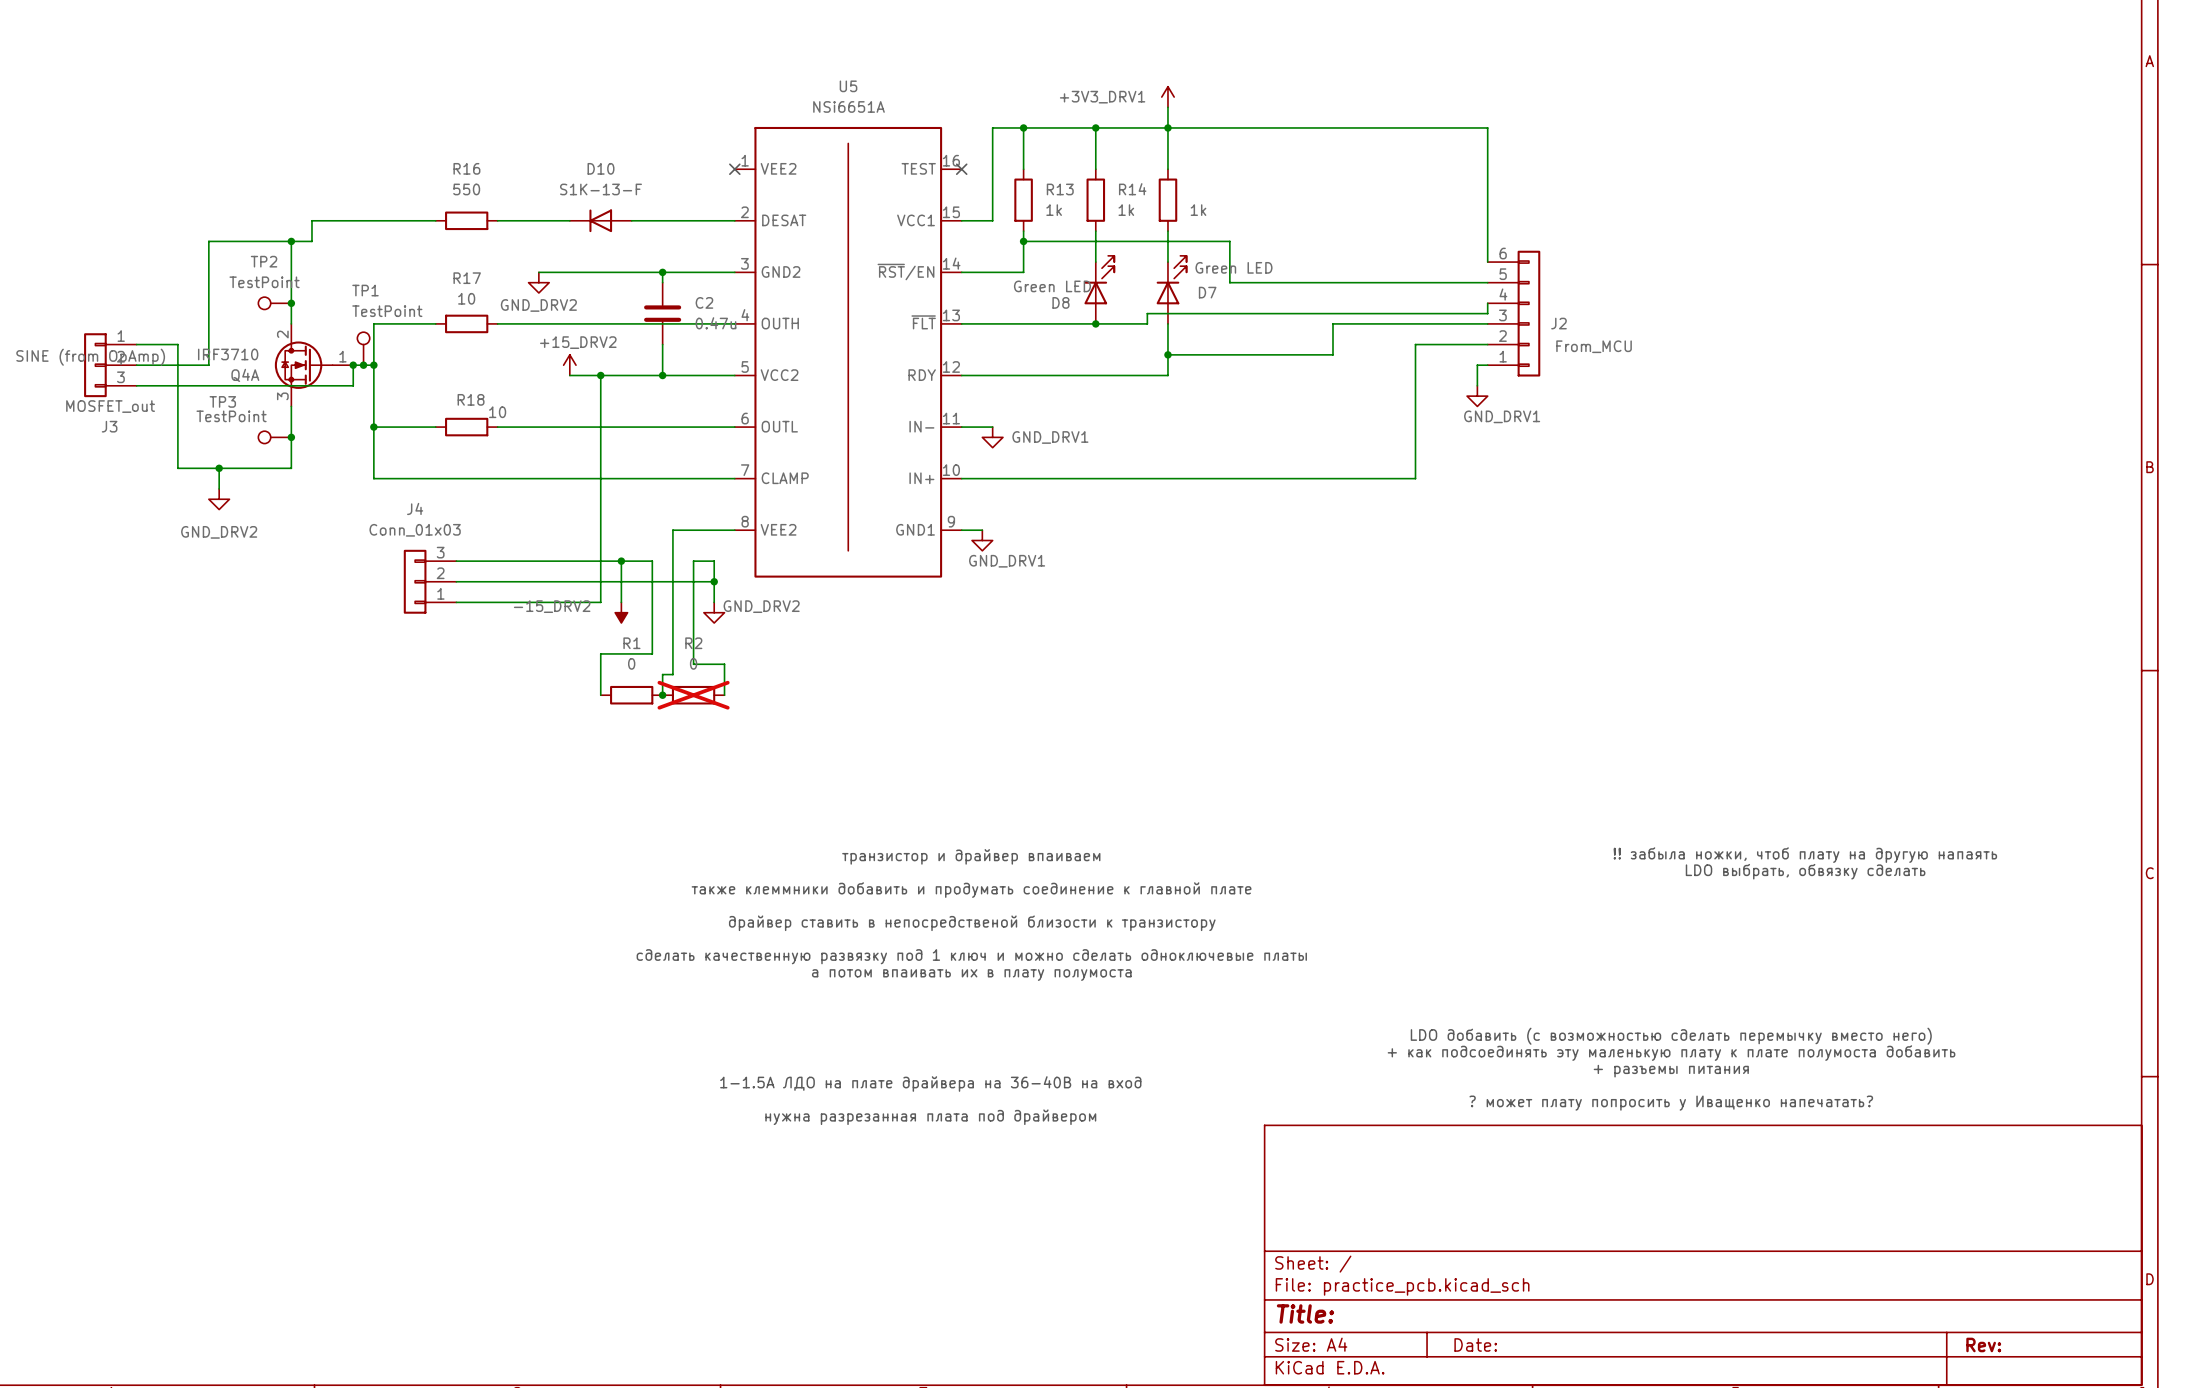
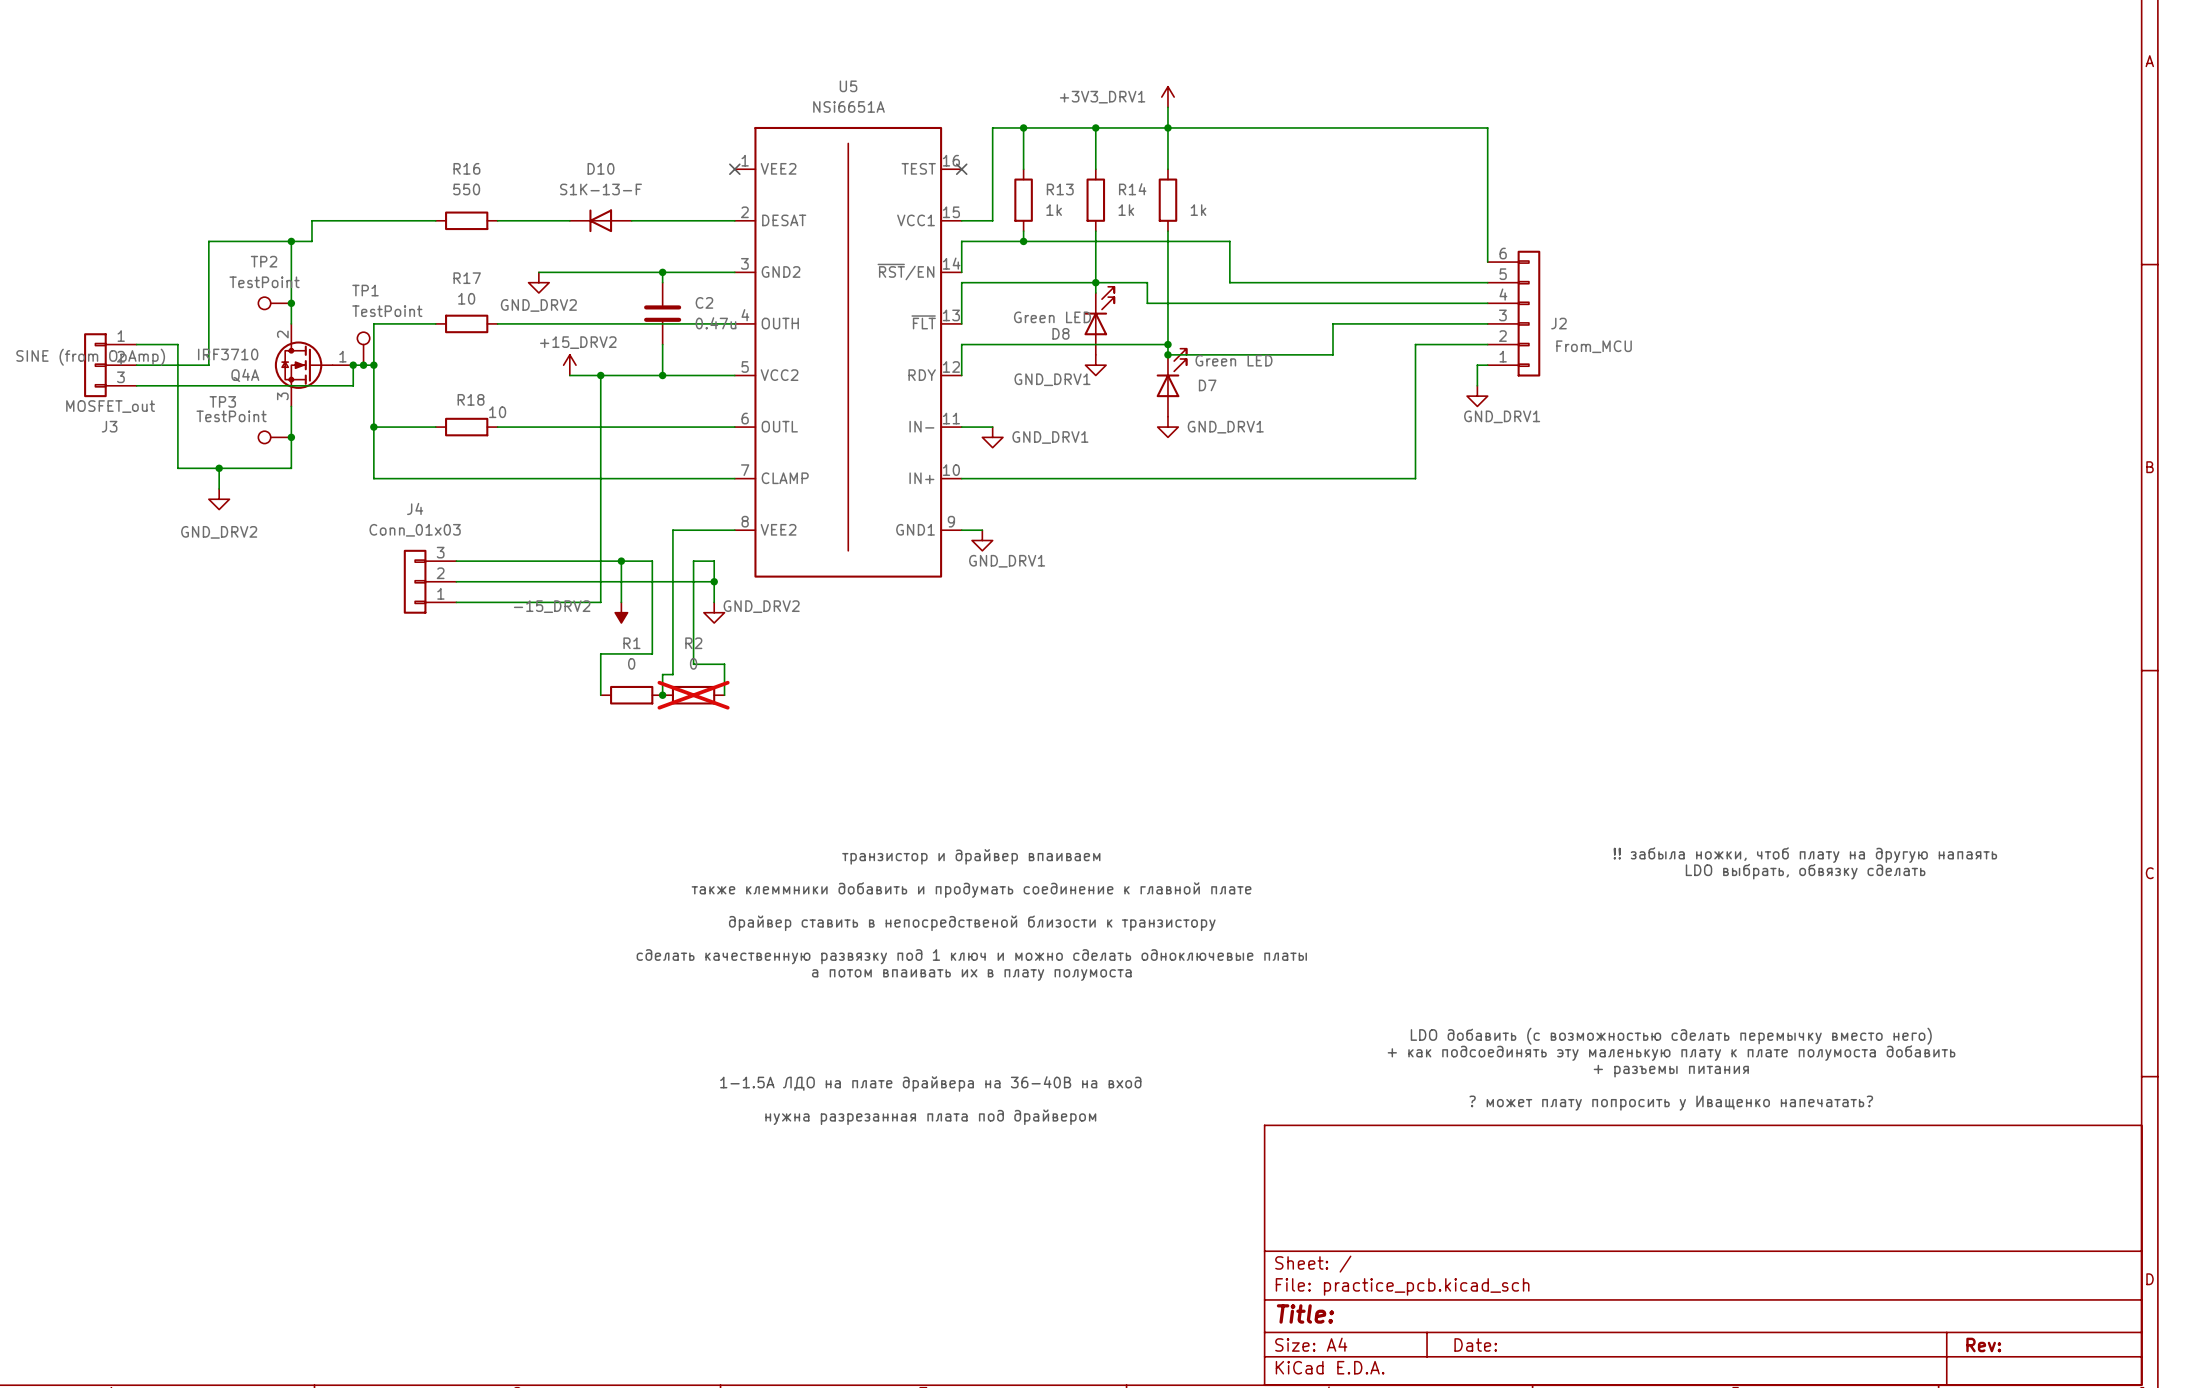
wire: (1023, 241) (1023, 272) (961, 272) -> (1023, 241) (961, 241) (961, 272)
junction: none -> (1095, 282)
D8 position: (1099, 289) -> (1099, 320)
D7 position: (1171, 289) -> (1171, 382)
wire: (1487, 303) (1487, 313) (1147, 313) (1147, 323) (961, 323) -> (1487, 303) (1147, 303) (1147, 282) (961, 282) (961, 323)
junction: (1095, 323) -> none
junction: none -> (1167, 344)
wire: (1167, 354) (1167, 375) (961, 375) -> (1167, 344) (961, 344) (961, 375)
power symbol: none -> GND_DRV1 (1095, 365)
power symbol: none -> GND_DRV1 (1167, 427)

